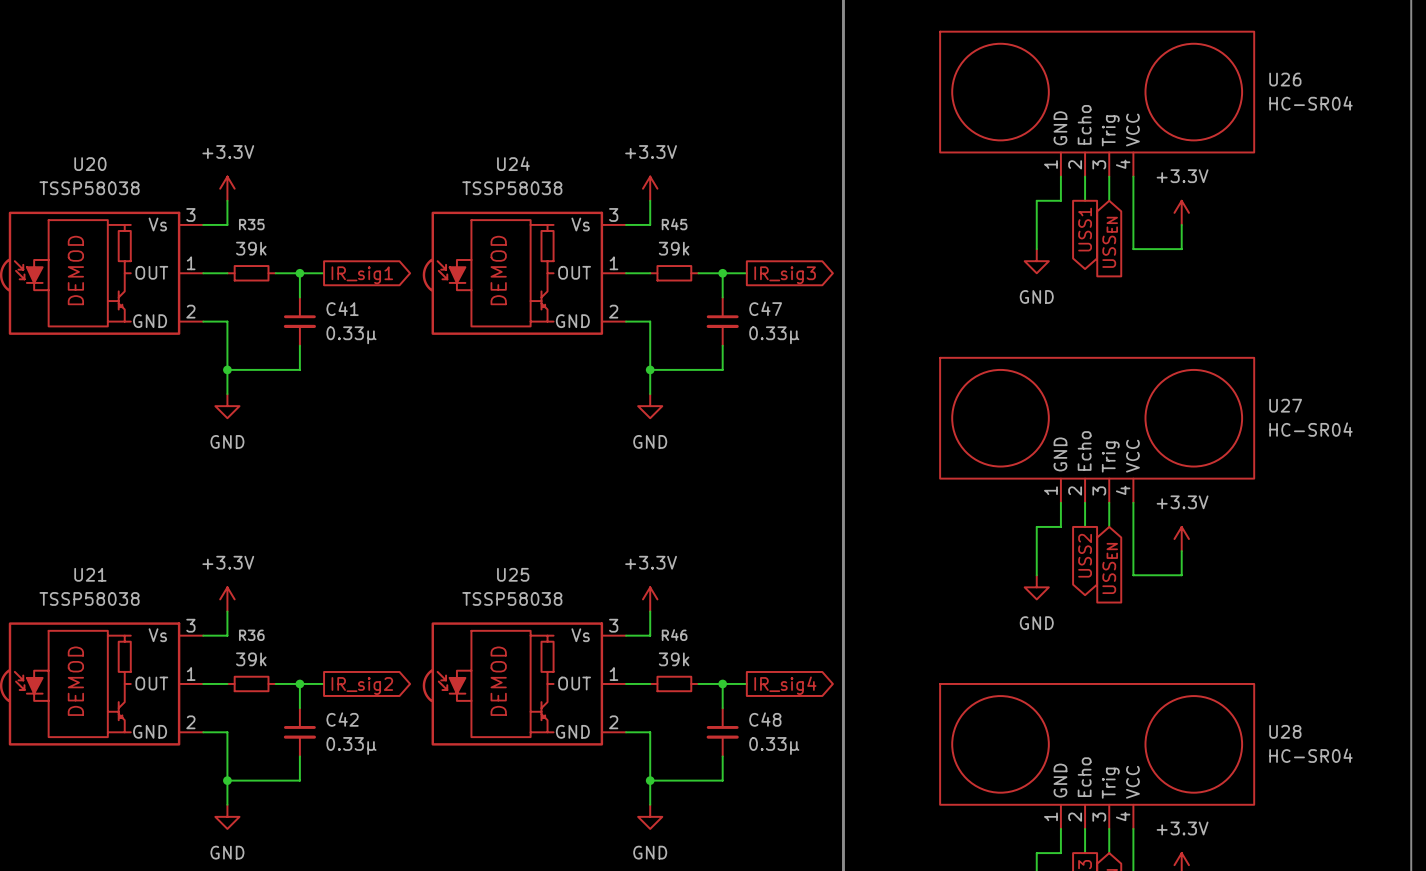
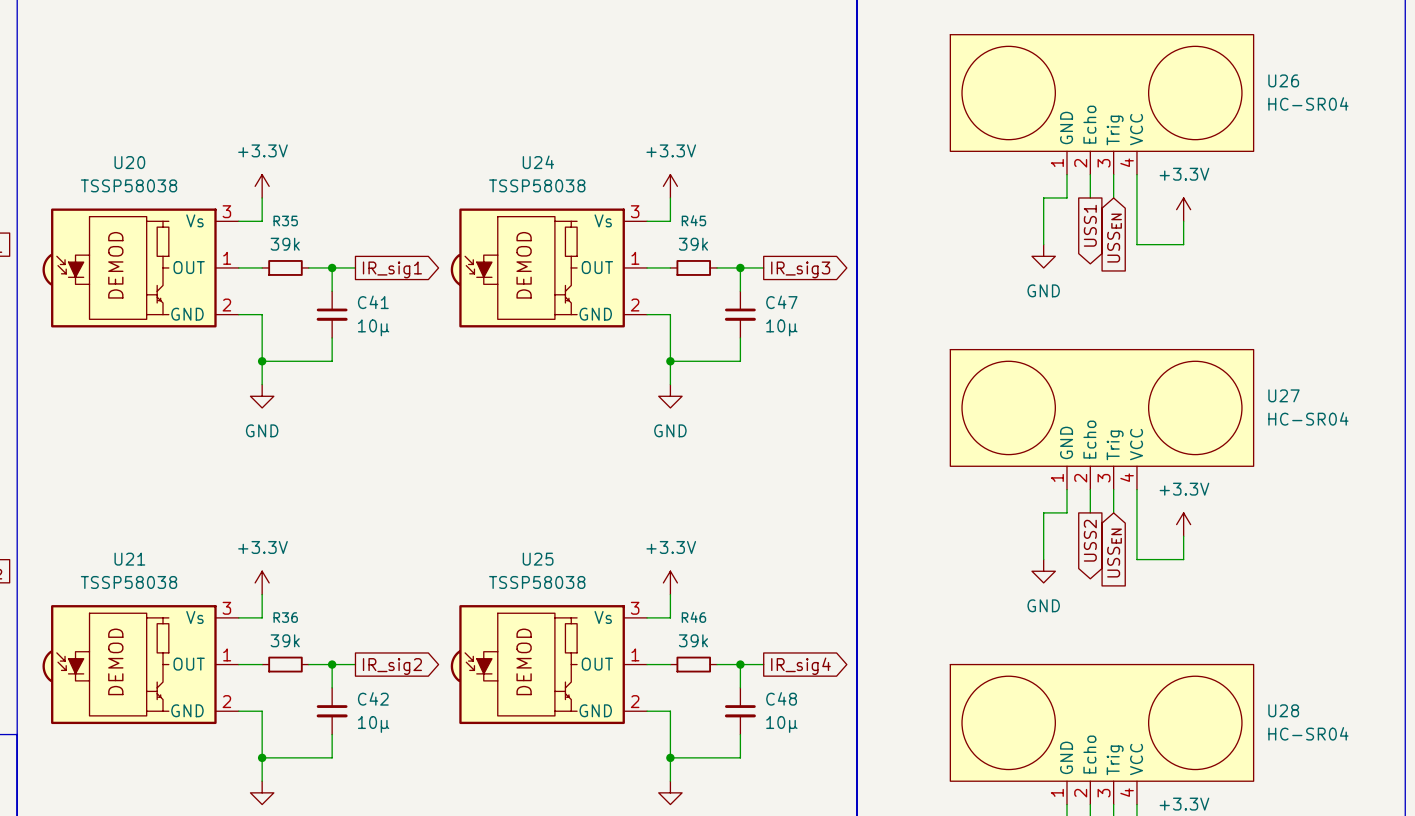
C41 value: 0.33μ (351, 335) -> 10μ (373, 327)
C47 value: 0.33μ (774, 335) -> 10μ (781, 327)
C42 value: 0.33μ (351, 746) -> 10μ (373, 724)
C48 value: 0.33μ (774, 746) -> 10μ (781, 724)

